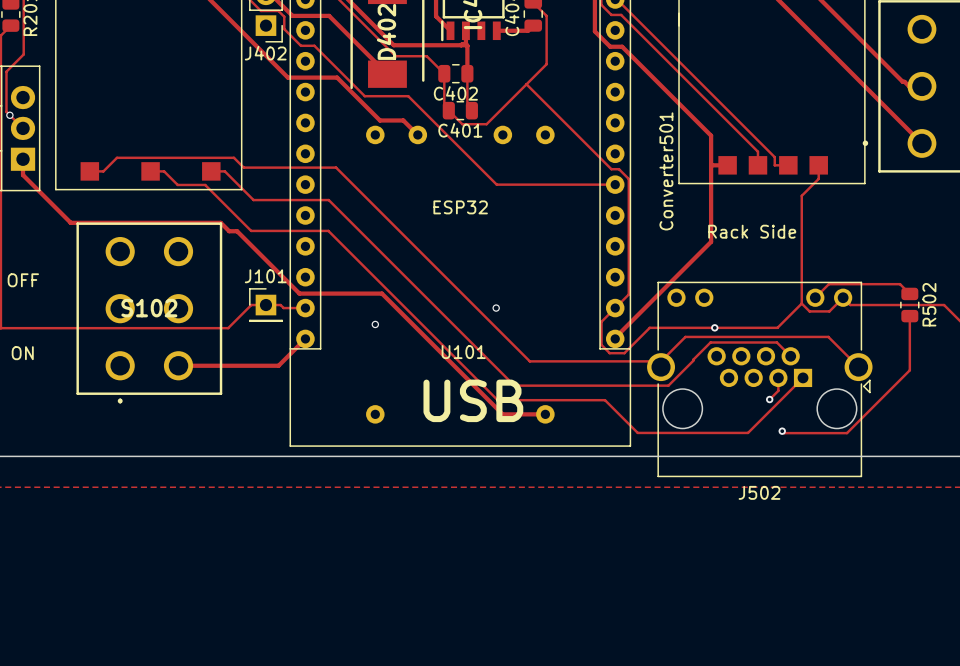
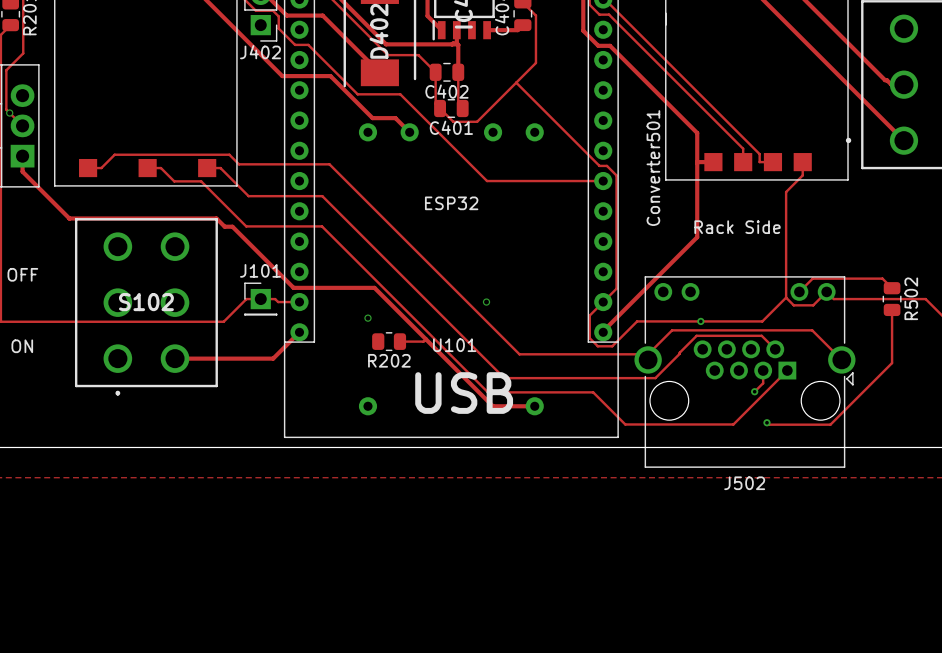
track: none -> (425, 339) (423, 341) (399, 341)
R202: none -> (389, 341)

